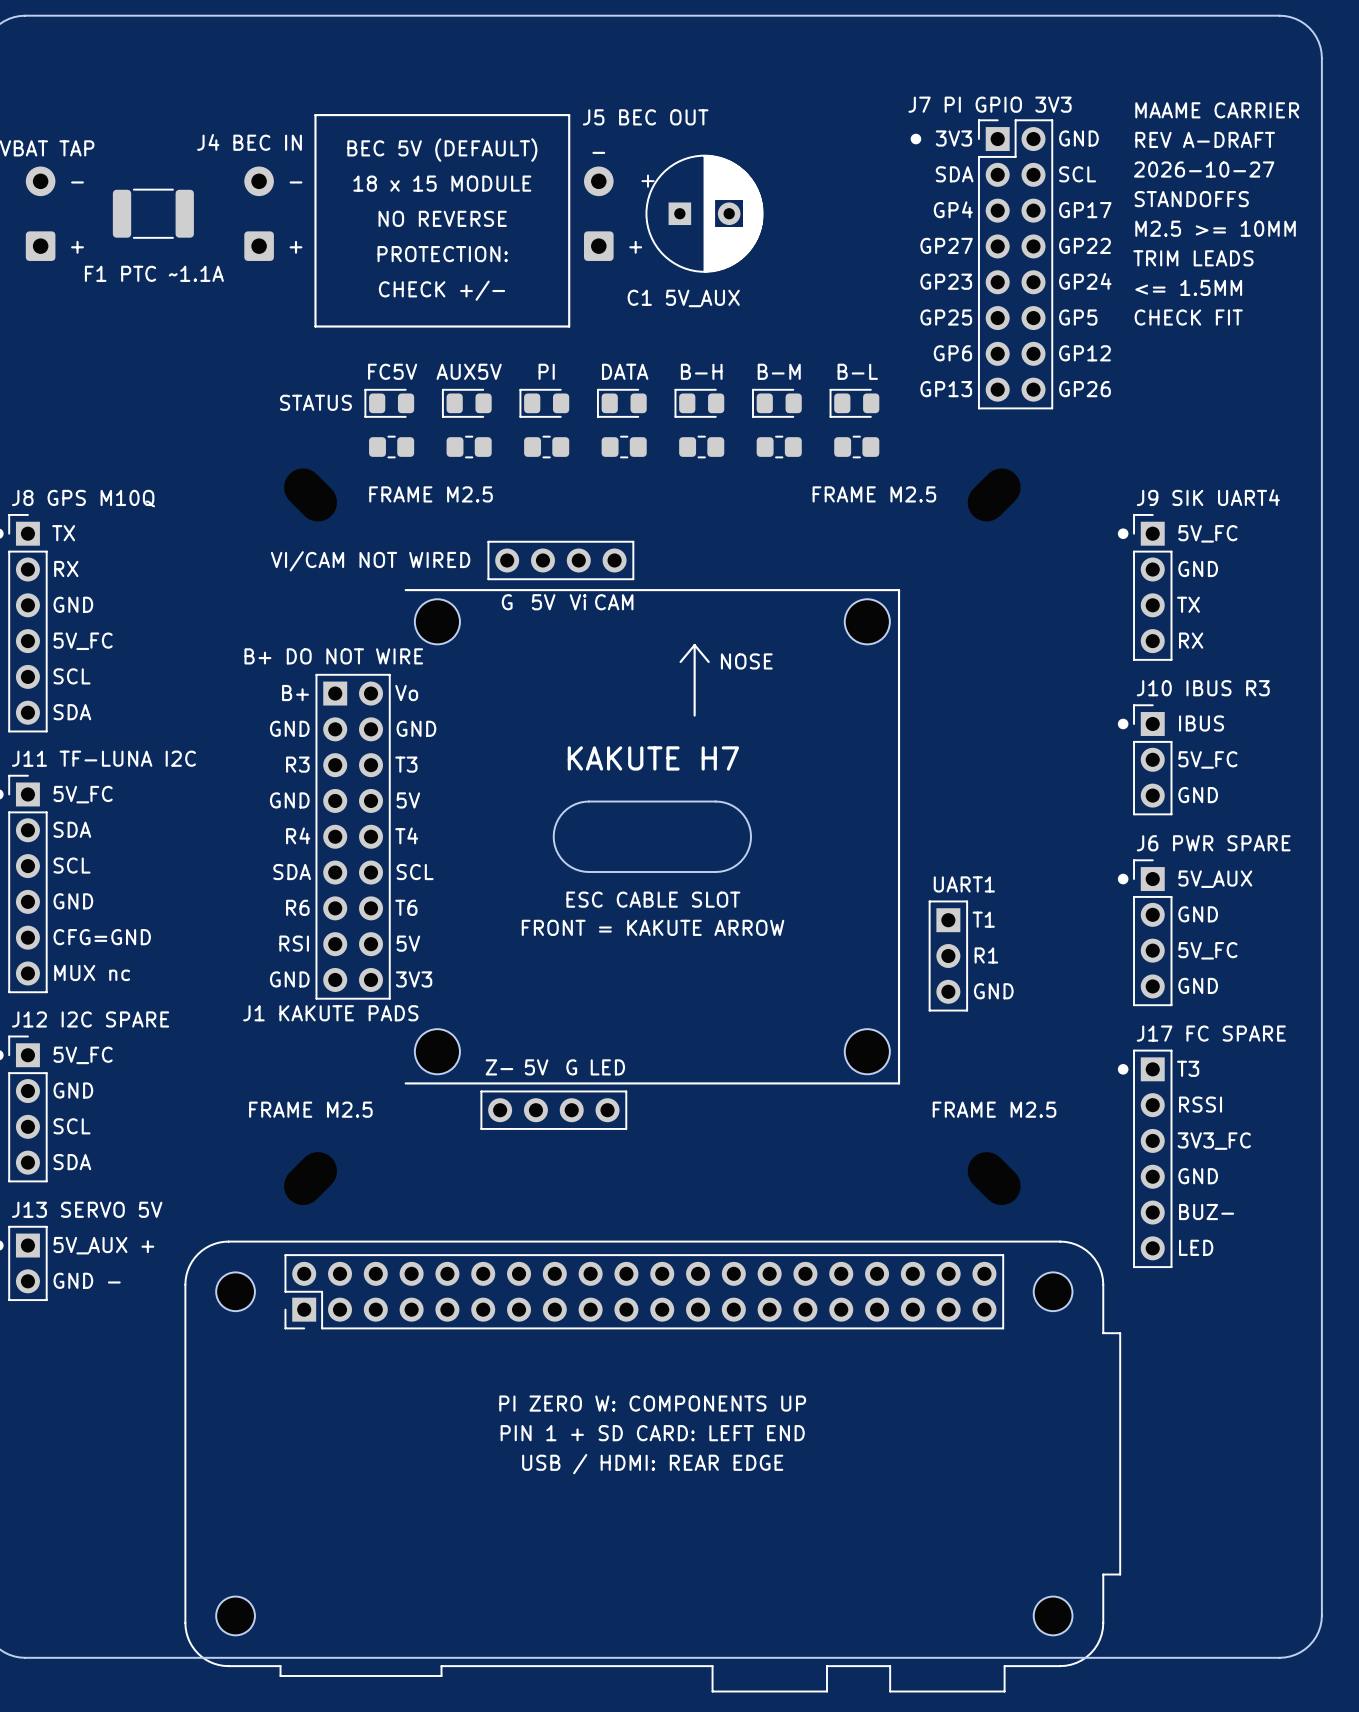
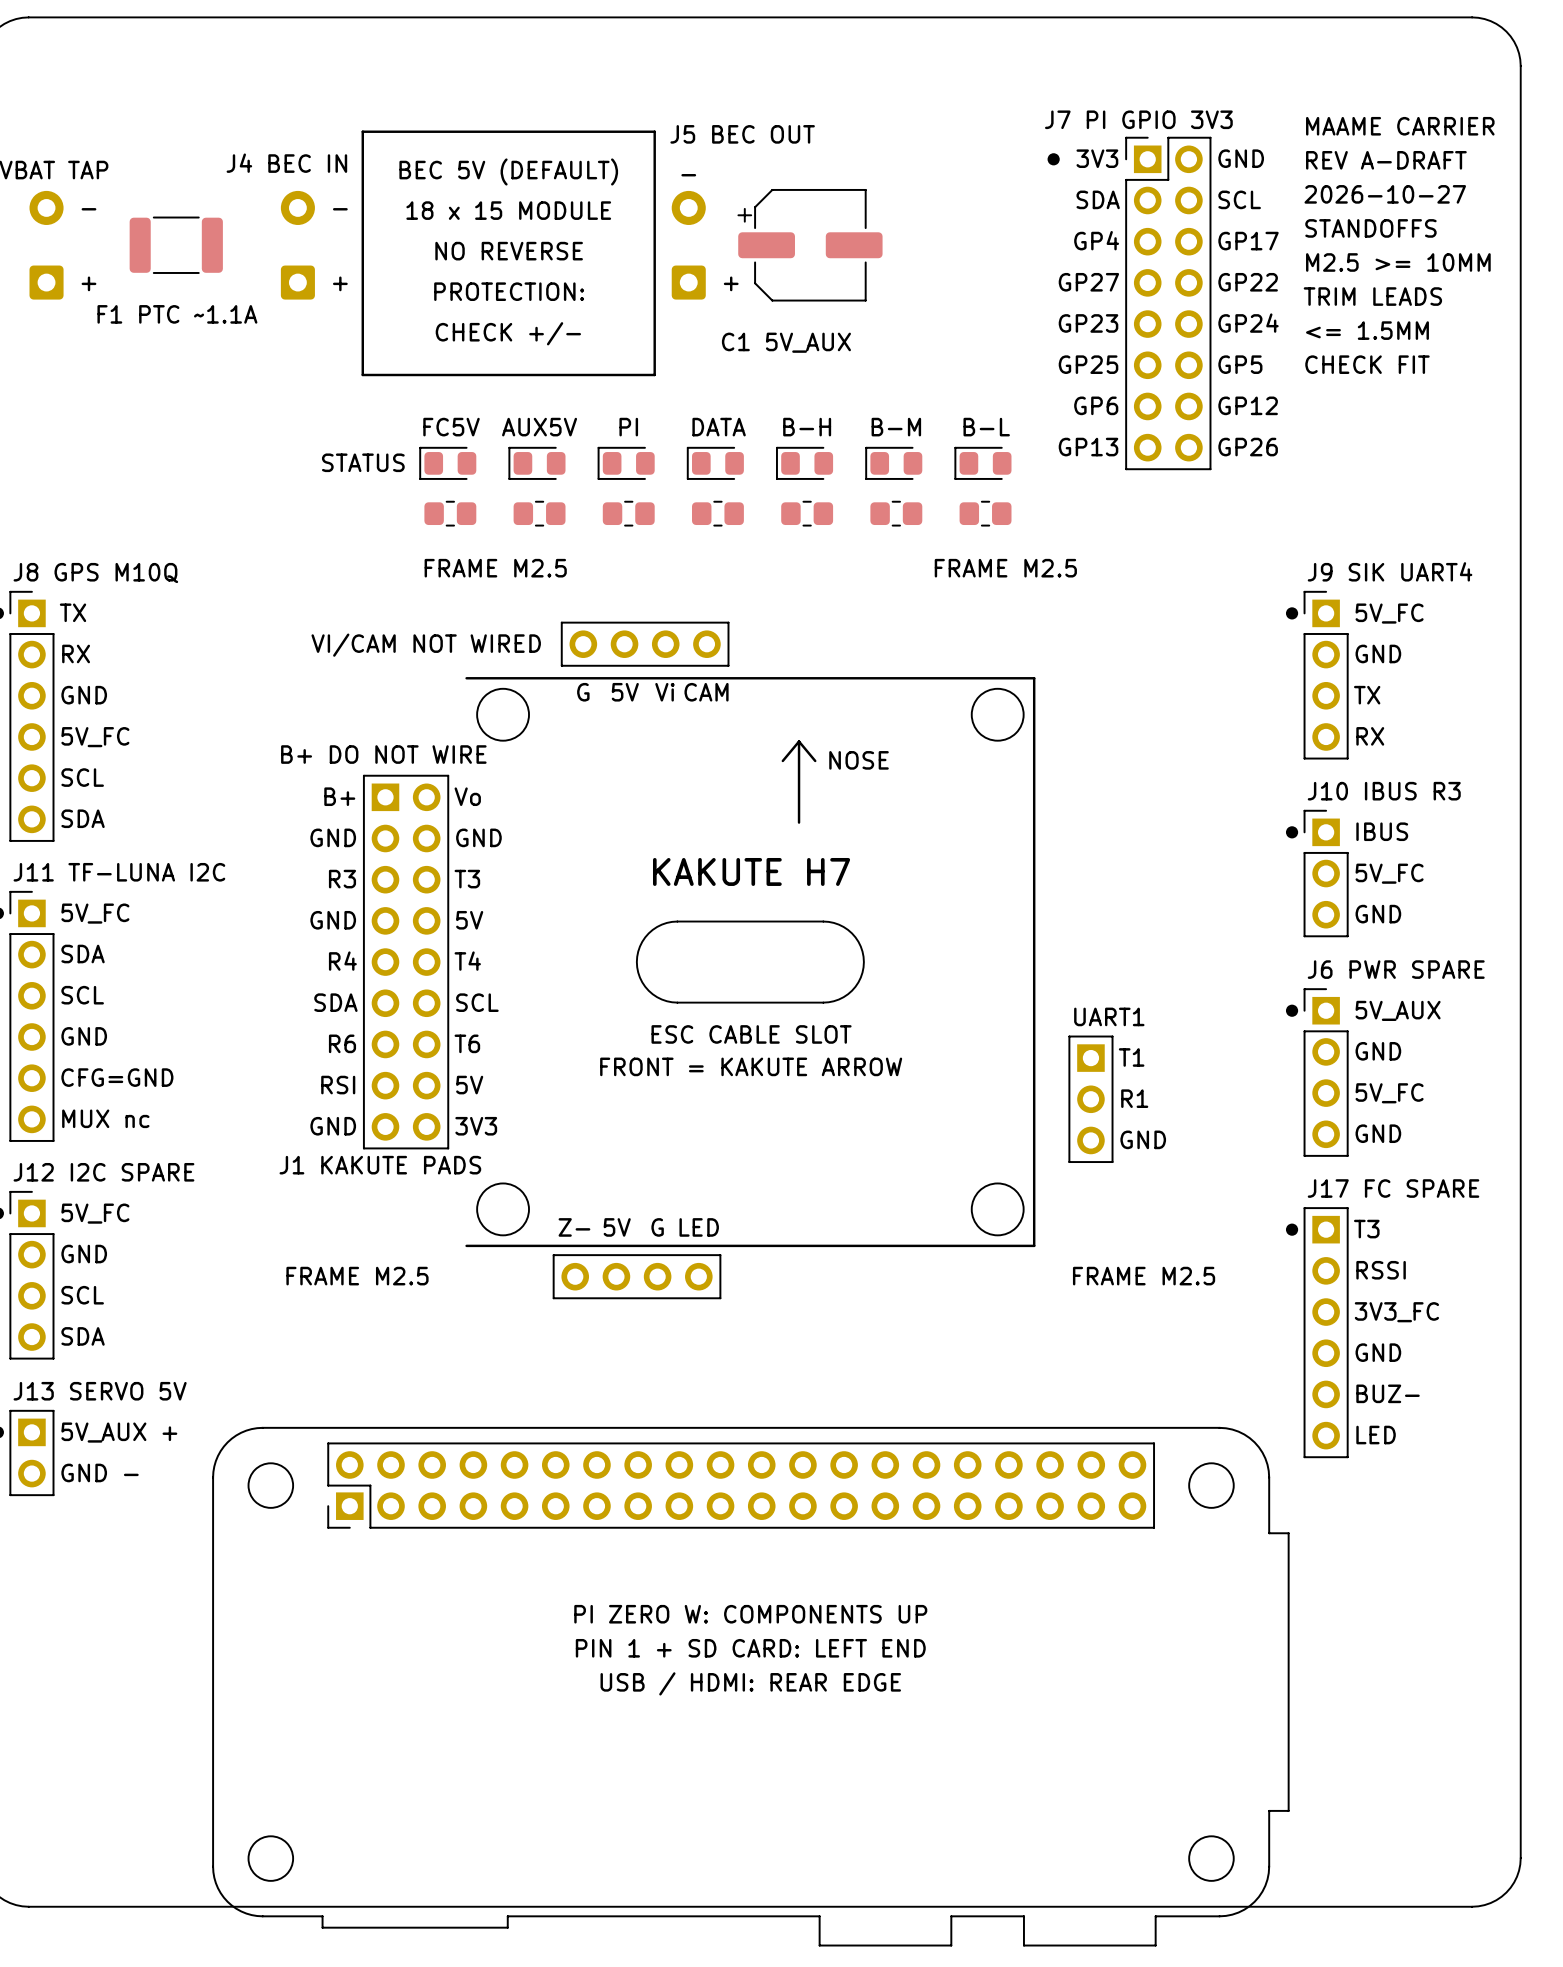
part footprint: [641, 154, 764, 273] -> [737, 188, 883, 302]

